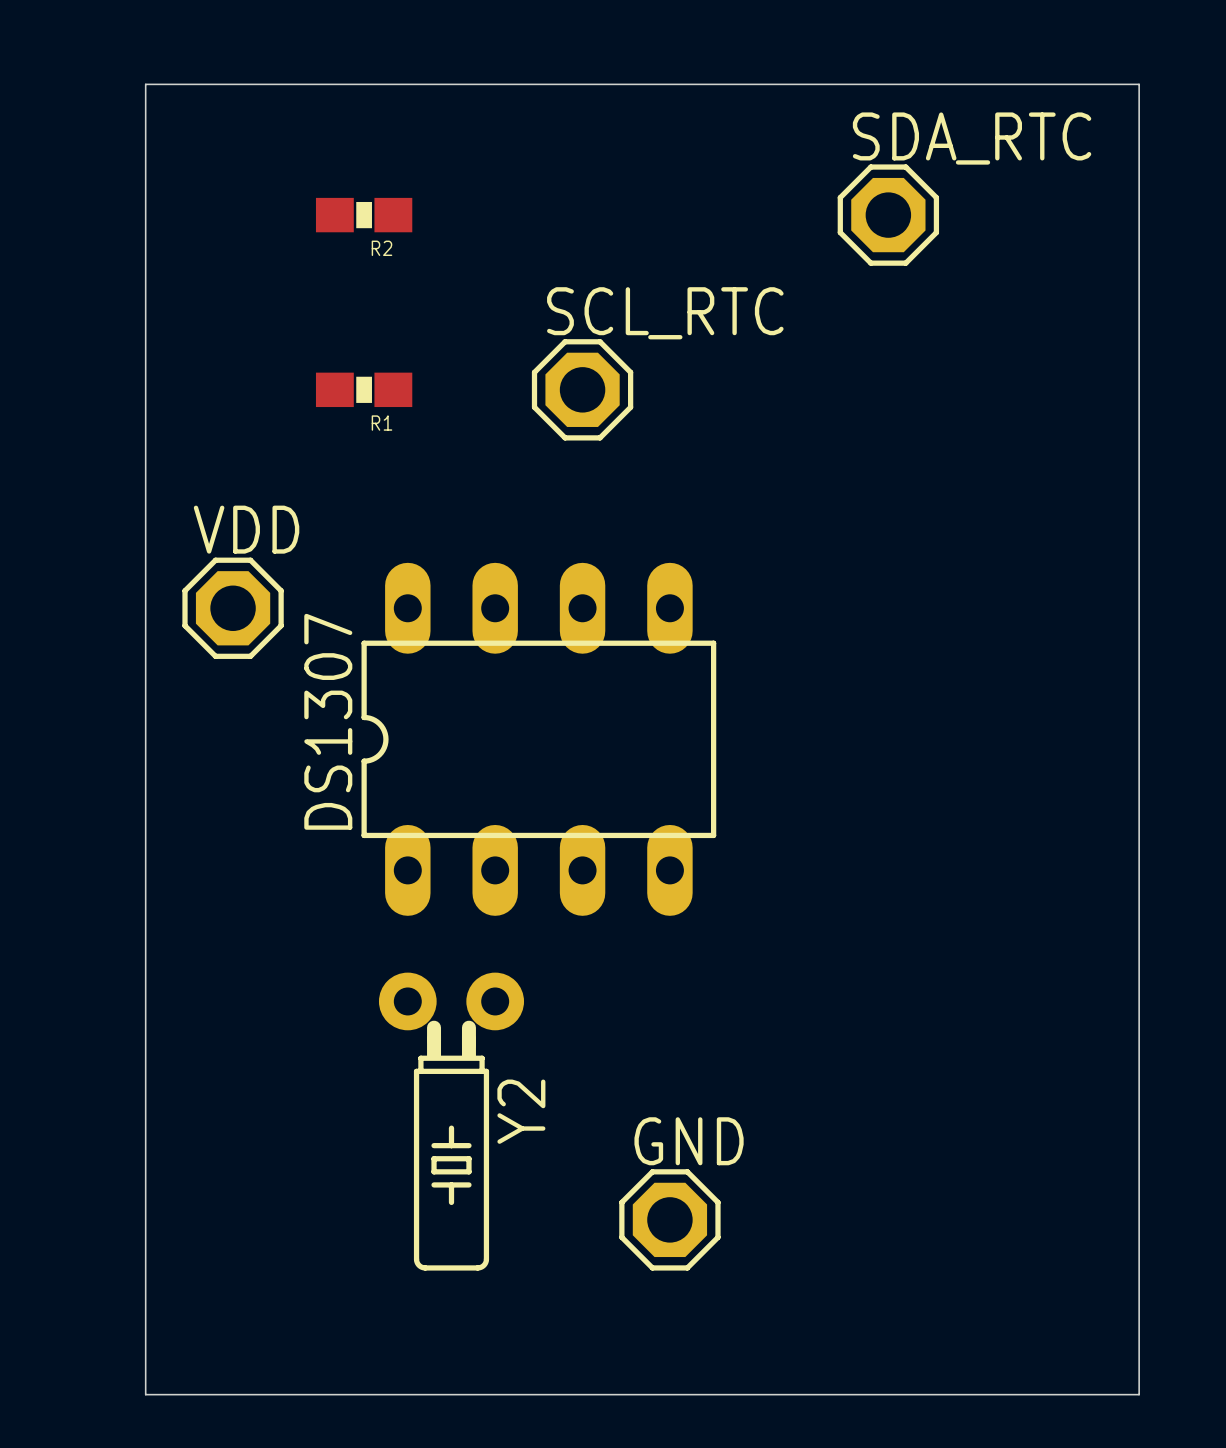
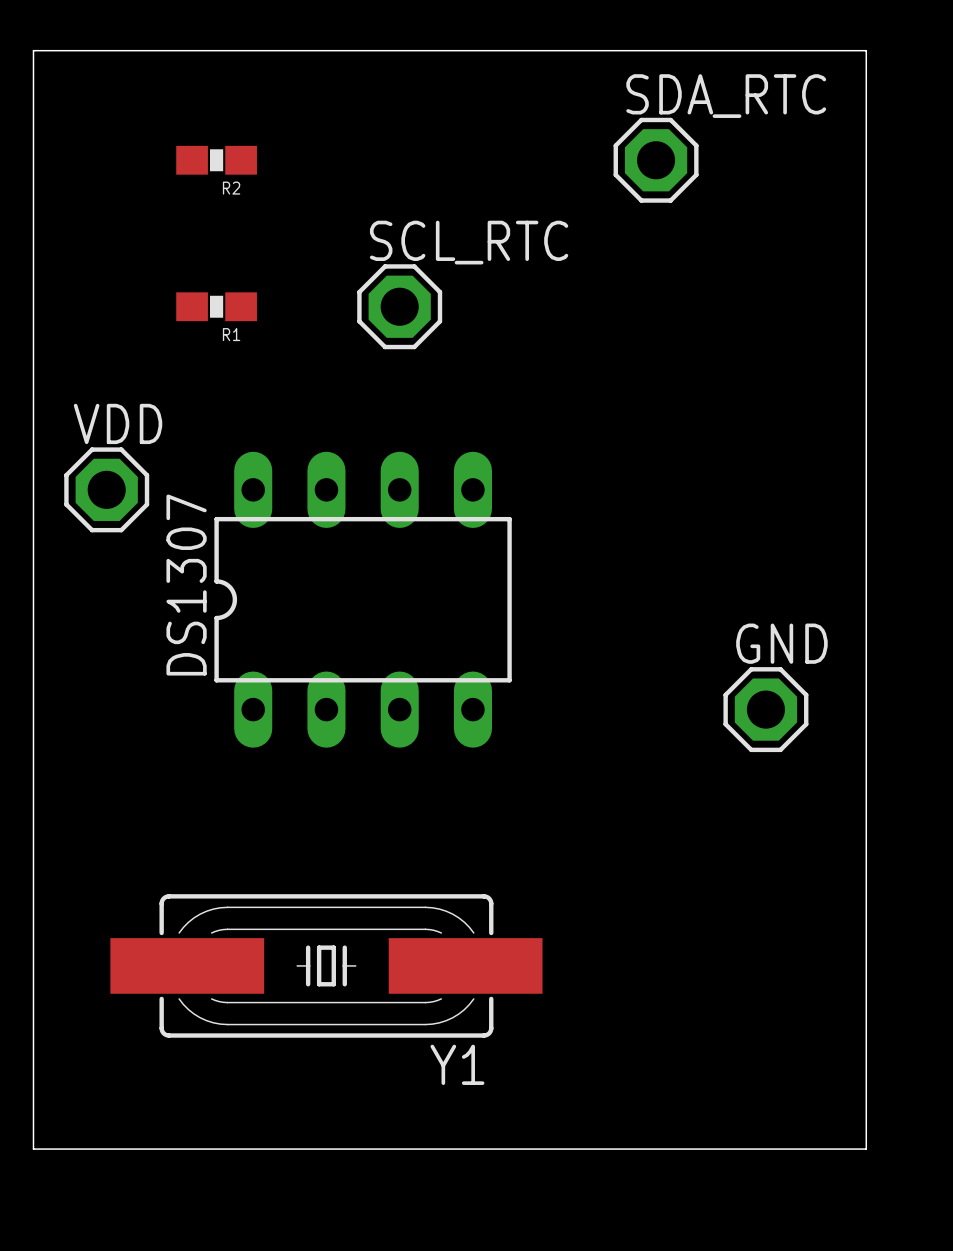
Y2: (451, 1121) -> none
Y1: none -> (326, 965)
GND position: (669, 1219) -> (765, 709)

